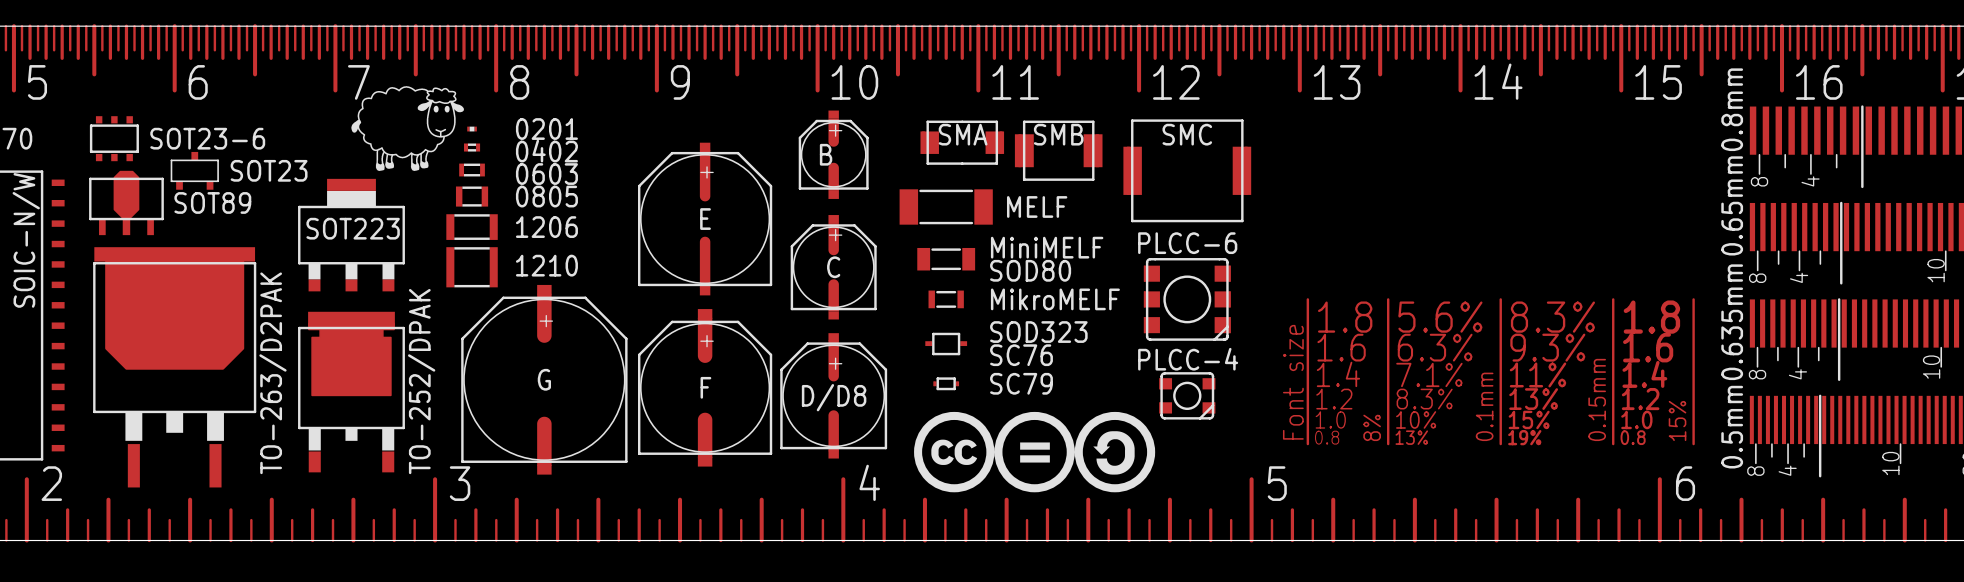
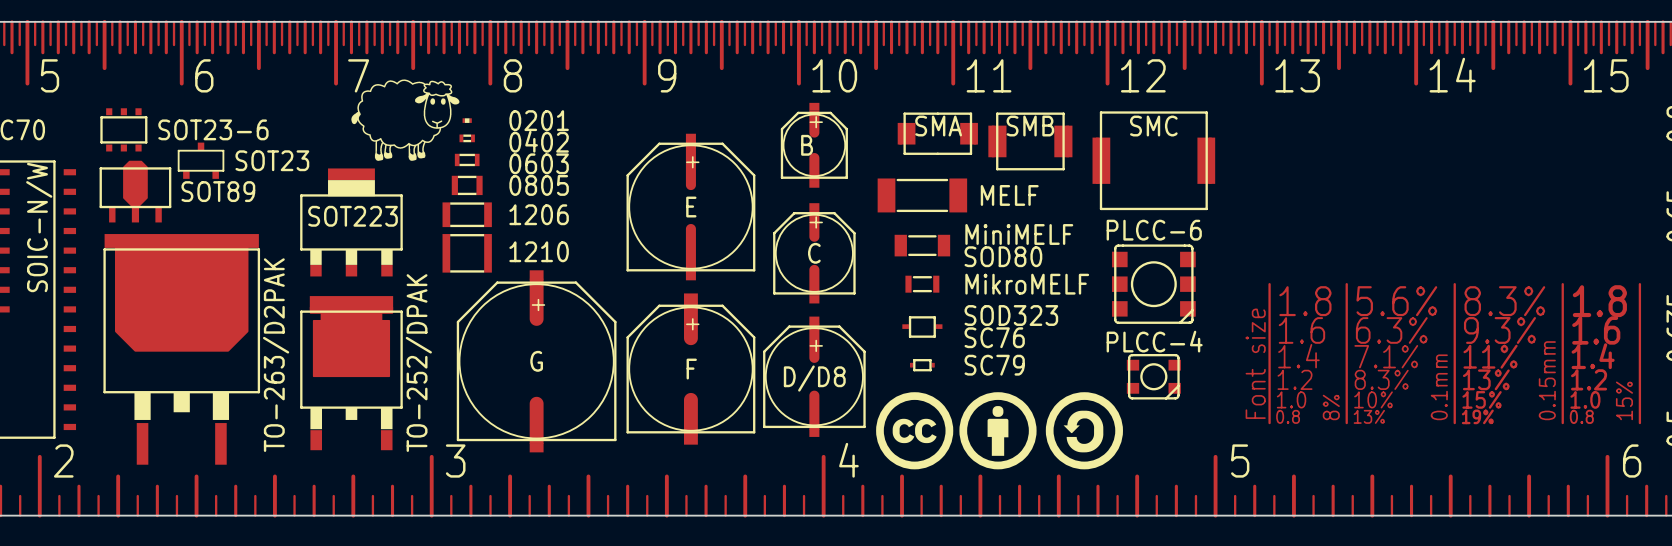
drawing shape: [994, 411, 1075, 493] -> [959, 392, 1037, 470]
drawing position: (954, 452) -> (914, 430)

